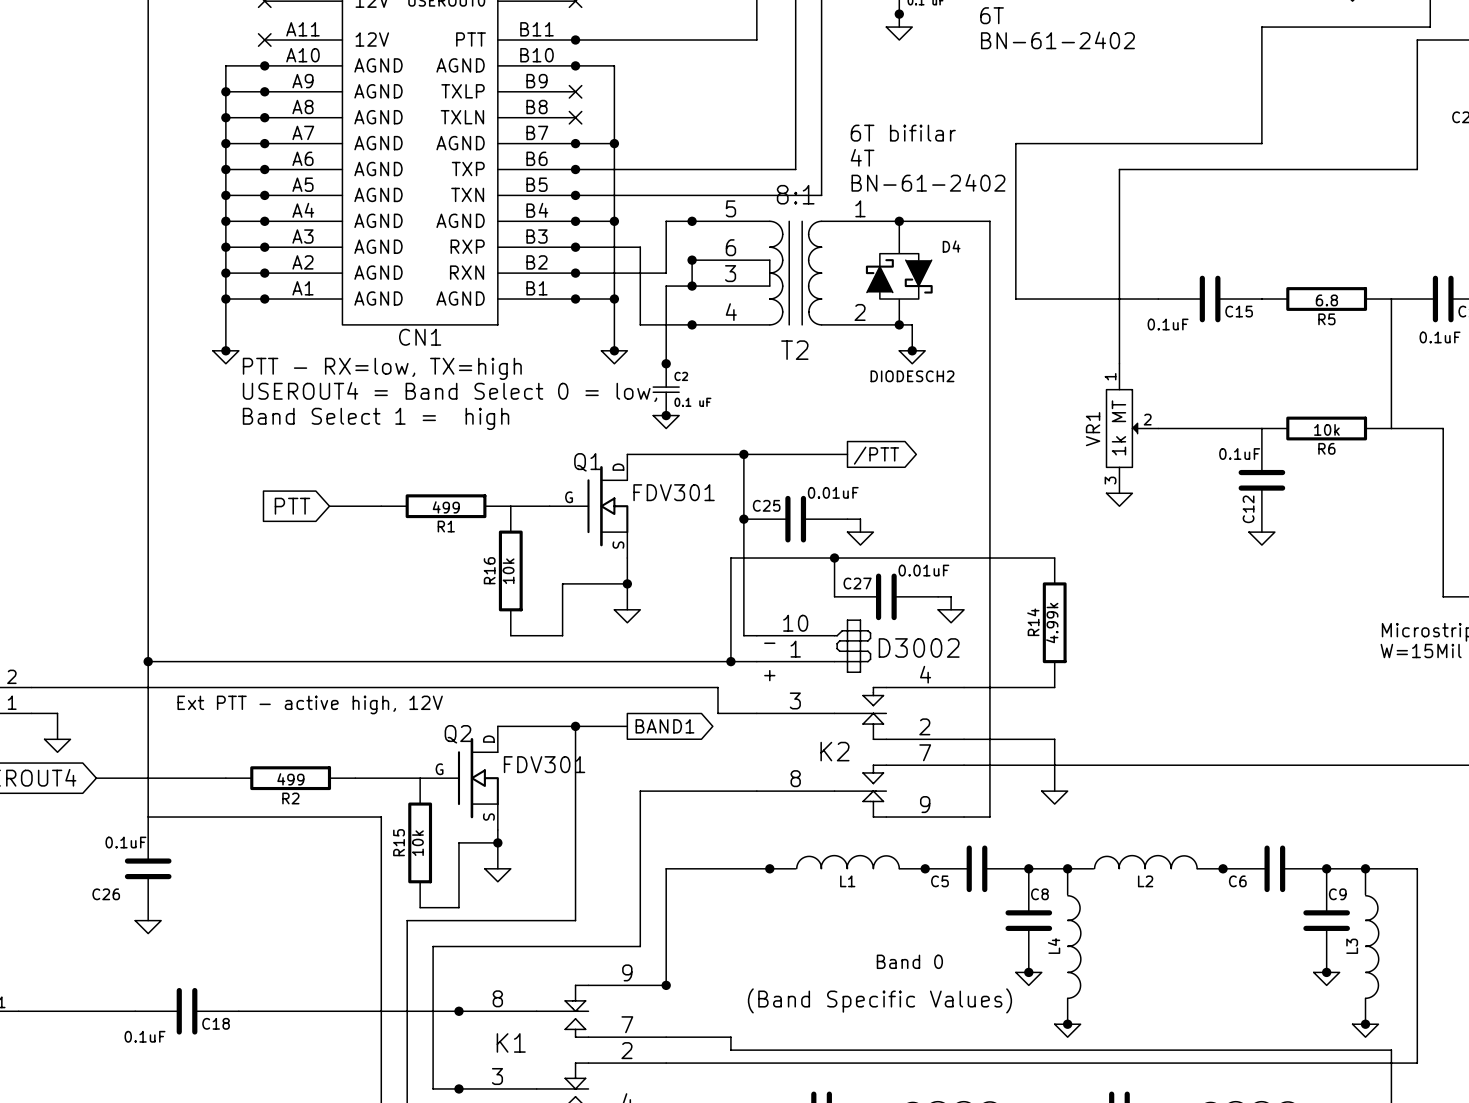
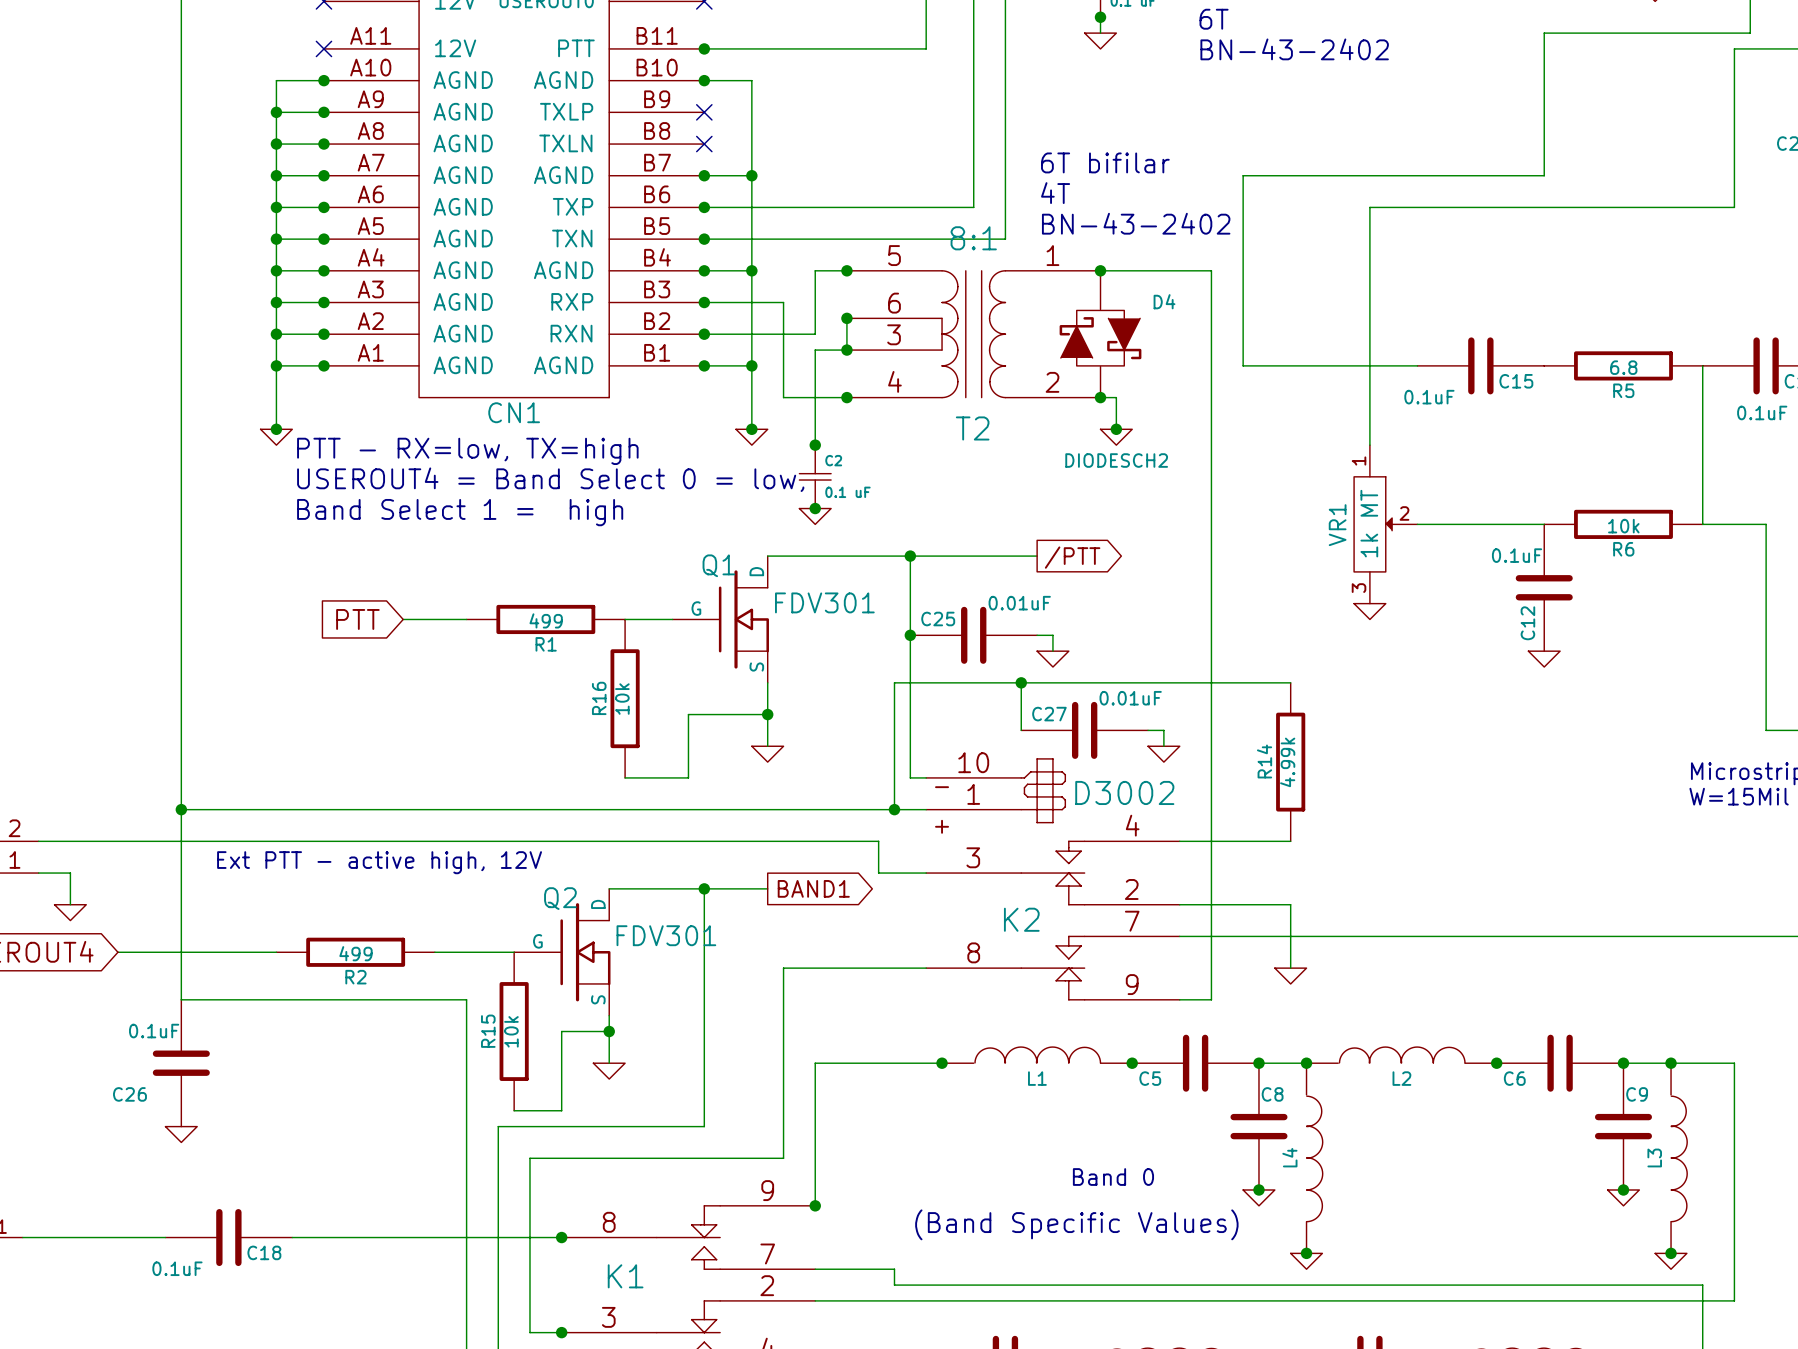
text: BN-61-2402 (1057, 40) -> BN-43-2402 (1294, 49)
text: BN-61-2402 (928, 182) -> BN-43-2402 (1136, 223)

